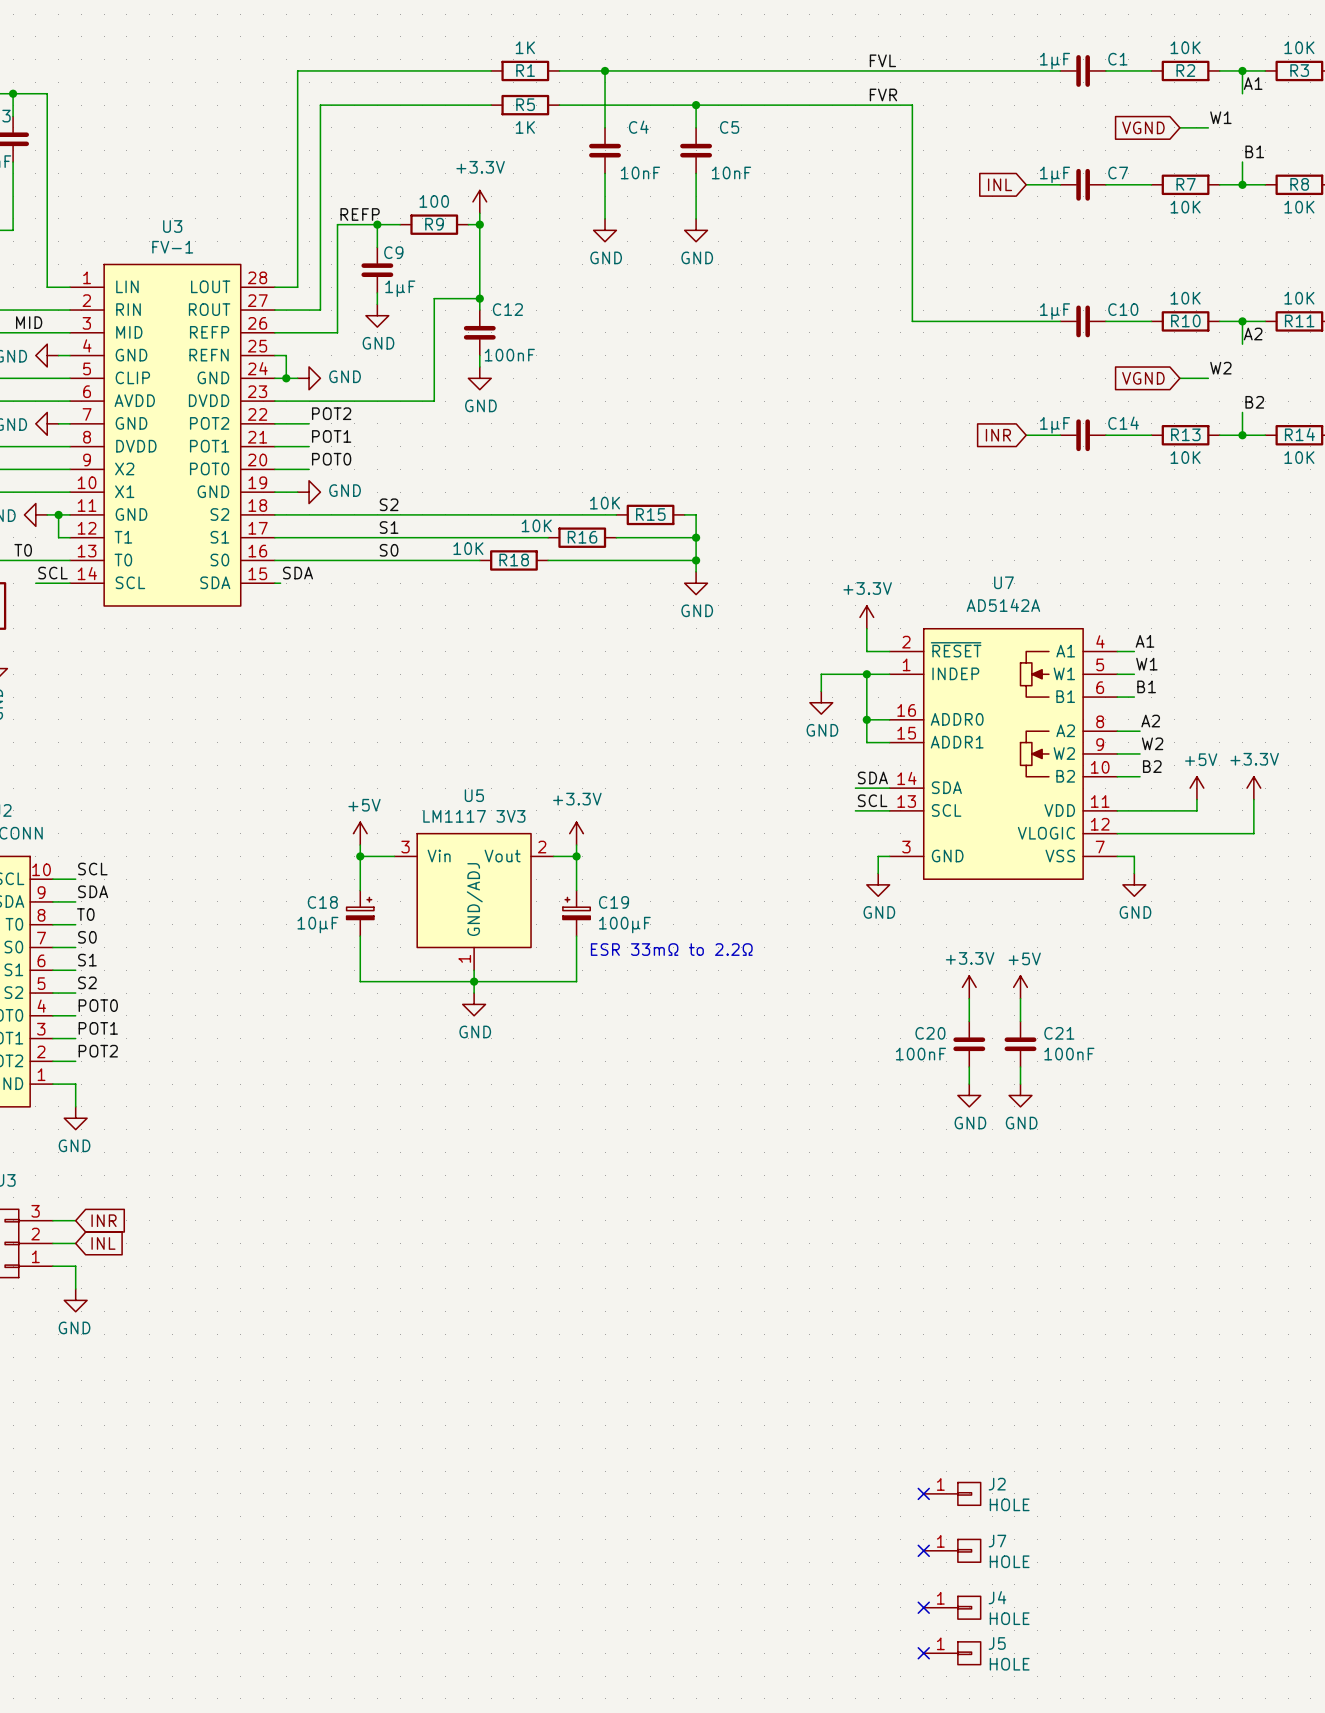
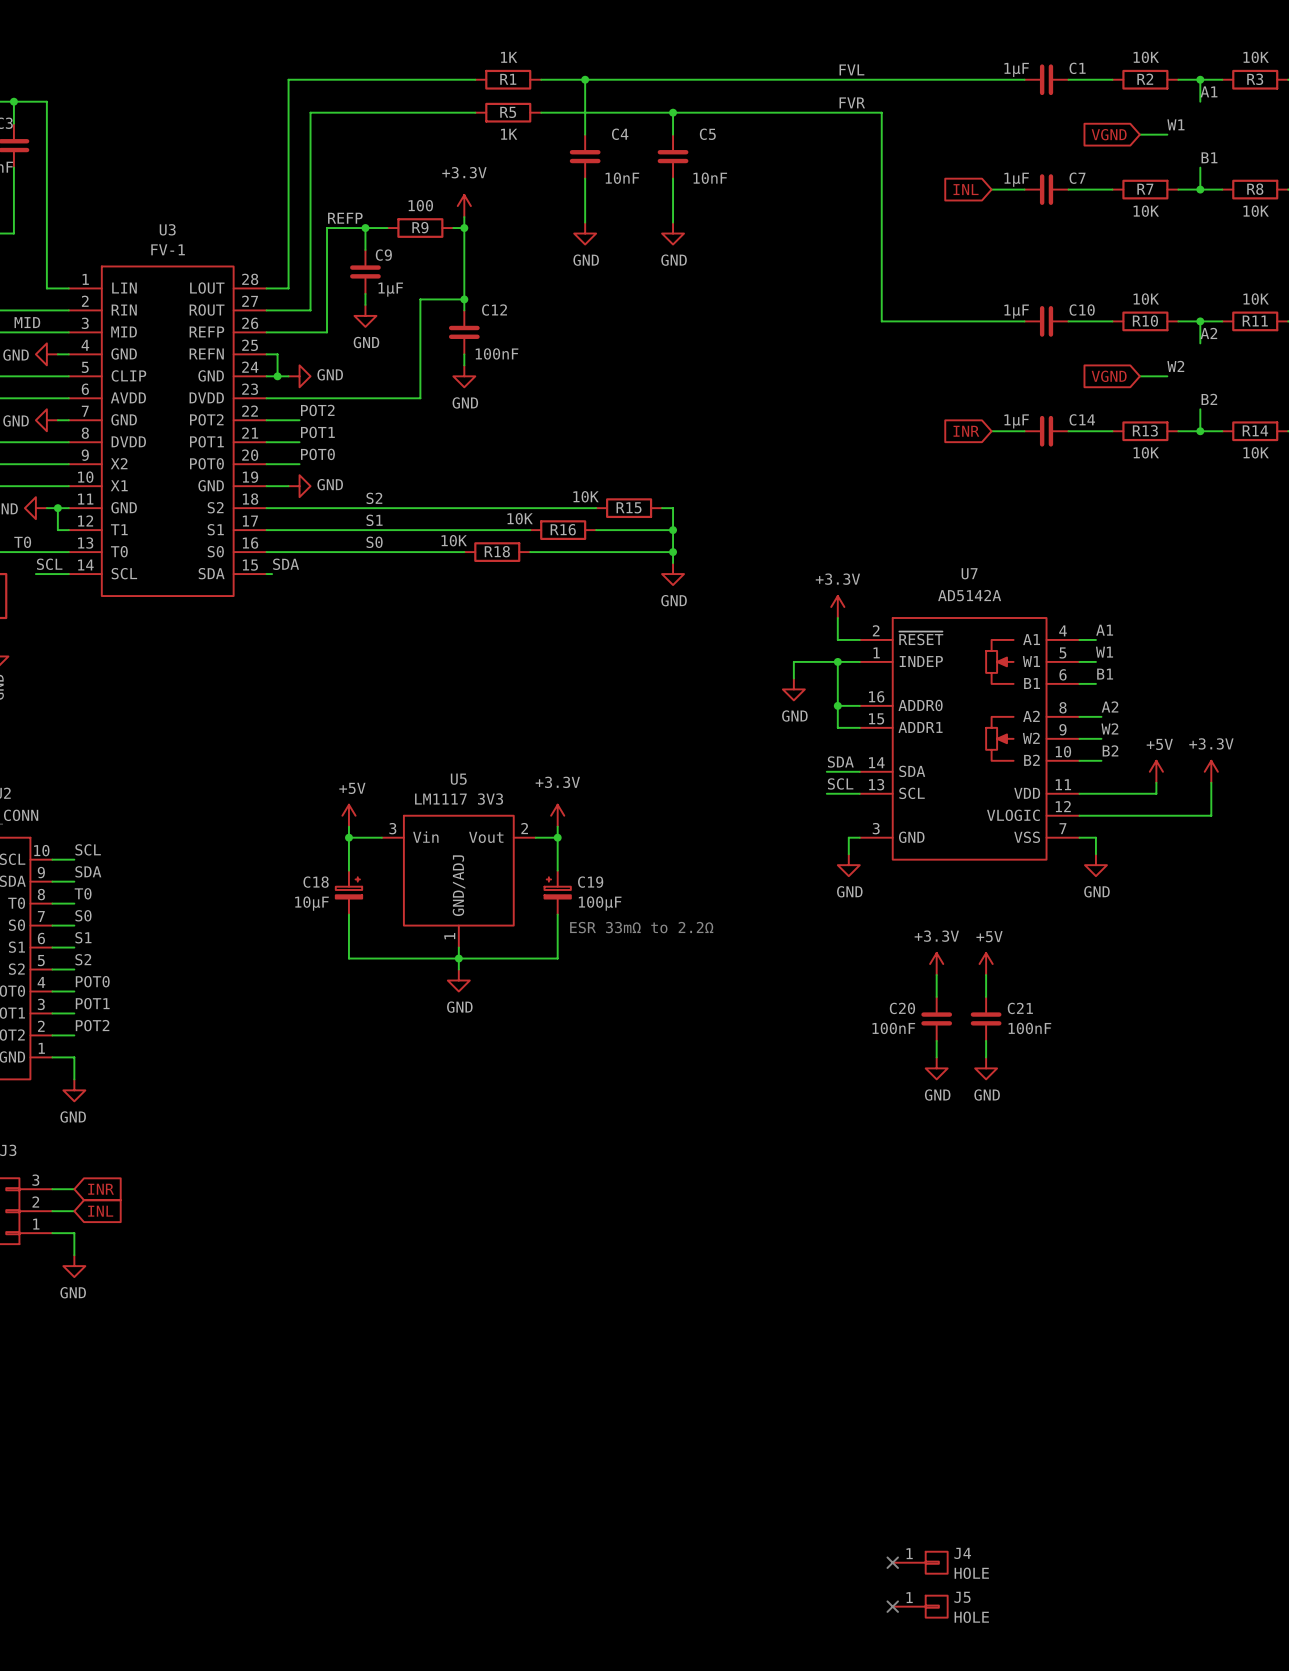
no-connect mark: (923, 1493) -> none
J2: HOLE (952, 1493) -> none
no-connect mark: (923, 1550) -> none
J7: HOLE (952, 1550) -> none

